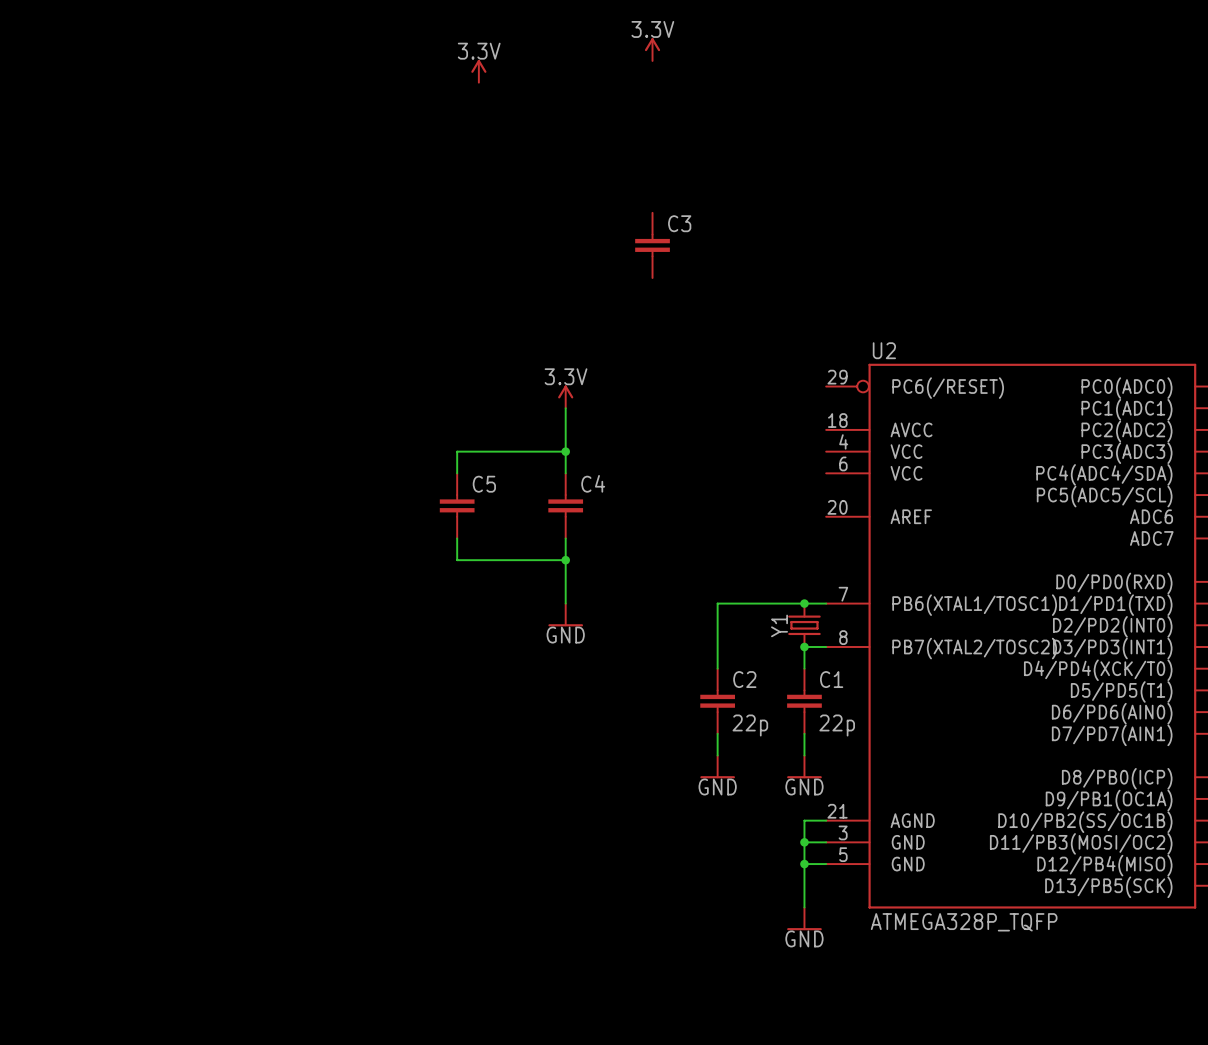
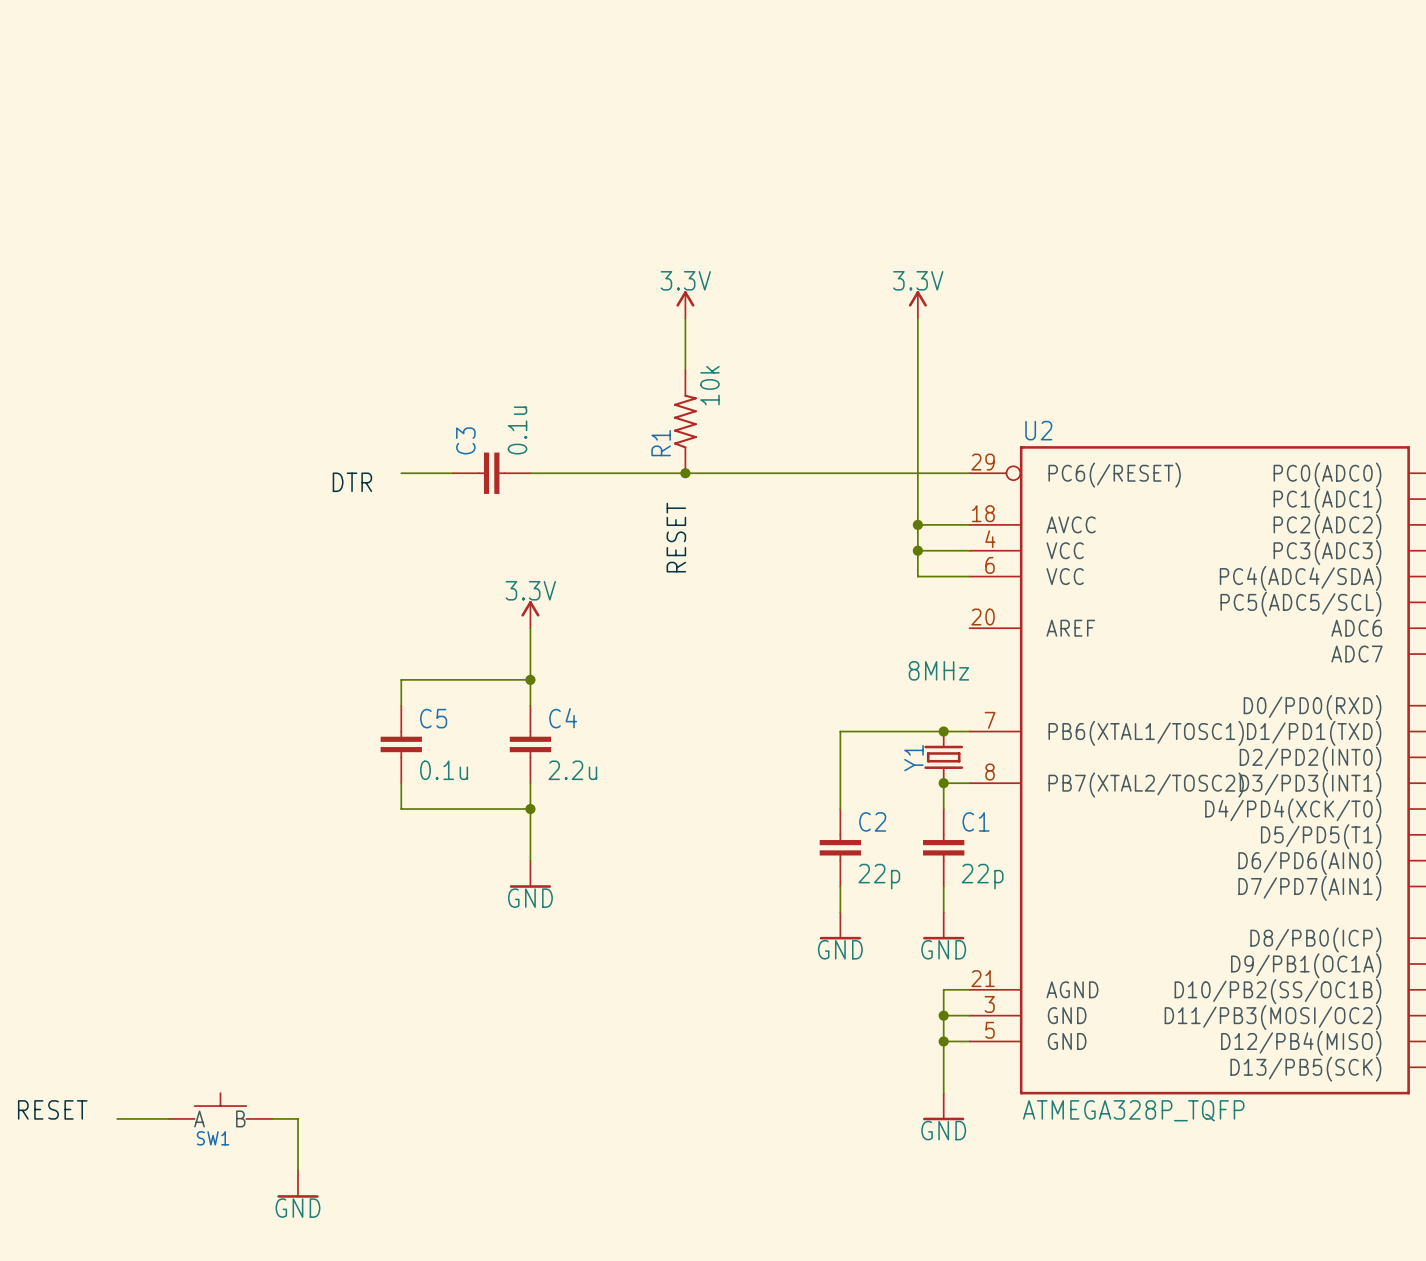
power symbol: 3.3V (652, 49) -> none
power symbol: 3.3V (478, 71) -> none
C3 name position: C3 (679, 223) -> C3 (465, 440)
power symbol: none -> 3.3V (685, 304)
power symbol: none -> 3.3V (917, 304)
C3 rotation: 0° (652, 245) -> 90° clockwise (491, 473)
C3 position: (652, 245) -> (491, 473)
wire: none -> (685, 318) (685, 369)
wire: none -> (917, 318) (917, 576) (969, 576)
R1: none -> 10k (685, 421)
C3 value: none -> 0.1u (517, 430)
wire: none -> (401, 473) (452, 473)
wire: none -> (530, 473) (969, 473)
junction: none -> (685, 473)
label: none -> DTR (352, 482)
power symbol: 3.3V (565, 396) -> none
wire: (565, 408) (565, 473) -> none
wire: none -> (917, 524) (969, 524)
junction: none -> (917, 524)
label: none -> RESET (676, 537)
wire: (565, 451) (457, 451) (457, 473) -> none
junction: (565, 451) -> none
wire: none -> (917, 550) (969, 550)
junction: none -> (917, 550)
C5 position: (457, 505) -> (401, 744)
power symbol: none -> 3.3V (530, 614)
C4 position: (565, 505) -> (530, 744)
wire: (565, 538) (565, 603) -> (530, 783) (530, 860)
Y1 value: none -> 8MHz (938, 670)
wire: (457, 560) (565, 560) -> none
junction: none -> (530, 679)
junction: (565, 560) -> none
wire: none -> (401, 705) (401, 679) (530, 679) (530, 705)
power symbol position: GND (565, 614) -> GND (530, 874)
C5 value: none -> 0.1u (444, 770)
C4 value: none -> 2.2u (572, 770)
wire: none -> (401, 783) (401, 809) (530, 809)
junction: none -> (530, 809)
SW1: none -> (220, 1106)
label: none -> RESET (52, 1109)
wire: none -> (117, 1118) (168, 1118)
wire: none -> (272, 1118) (297, 1118) (297, 1170)
power symbol: none -> GND (297, 1184)

